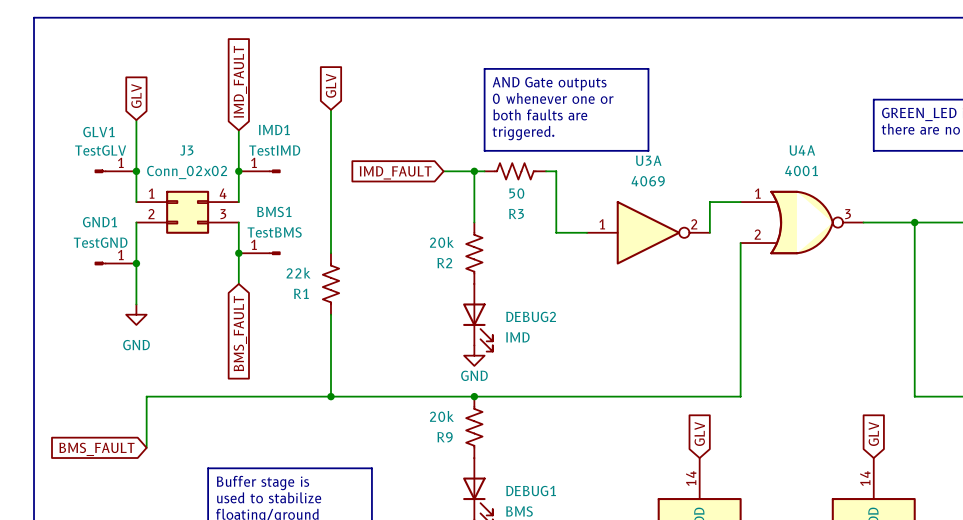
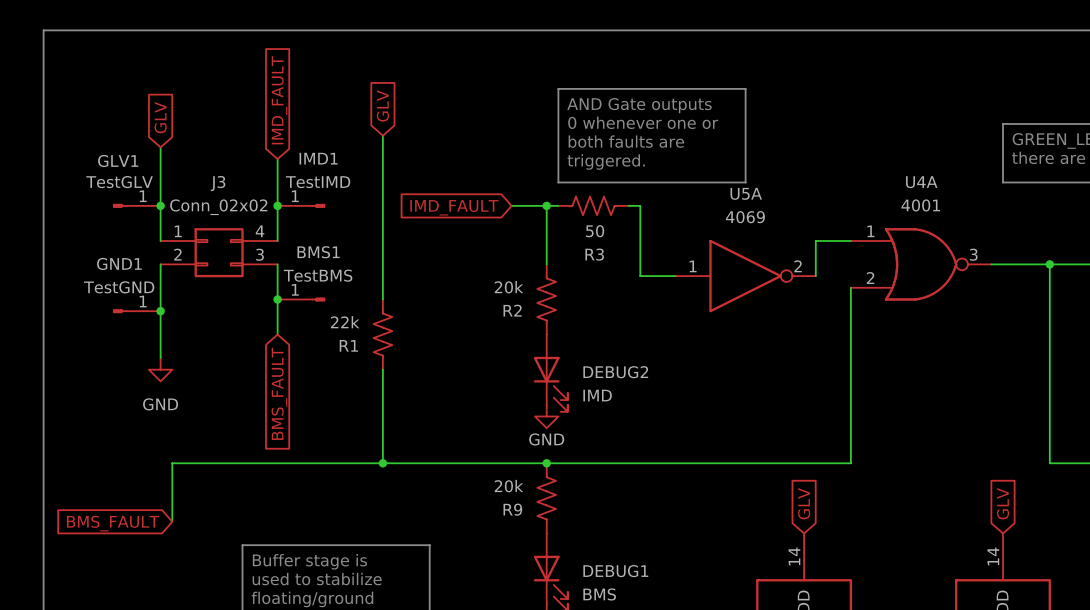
U3A name: U3A (648, 160) -> U5A (746, 193)

